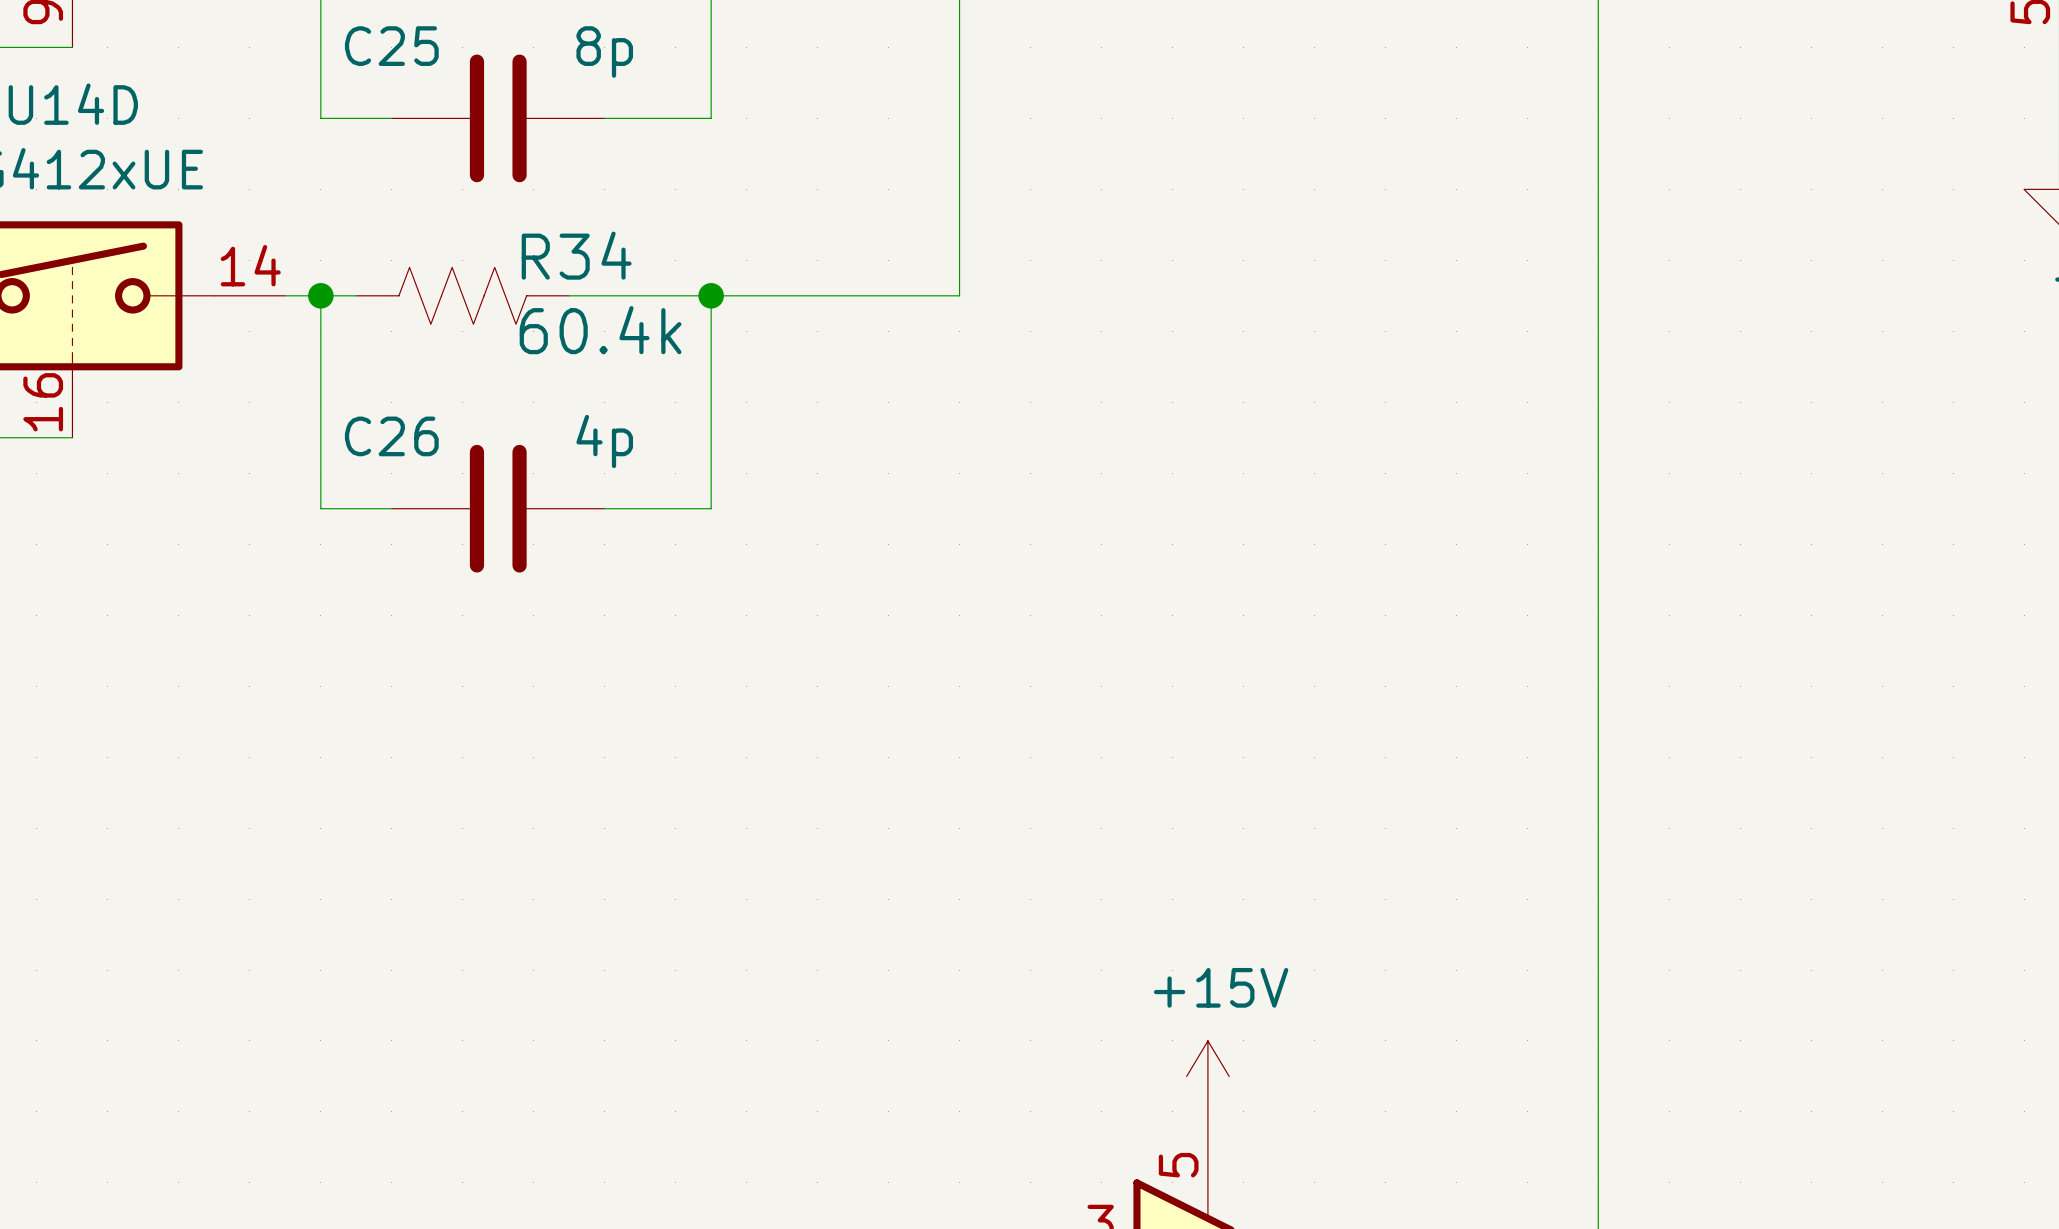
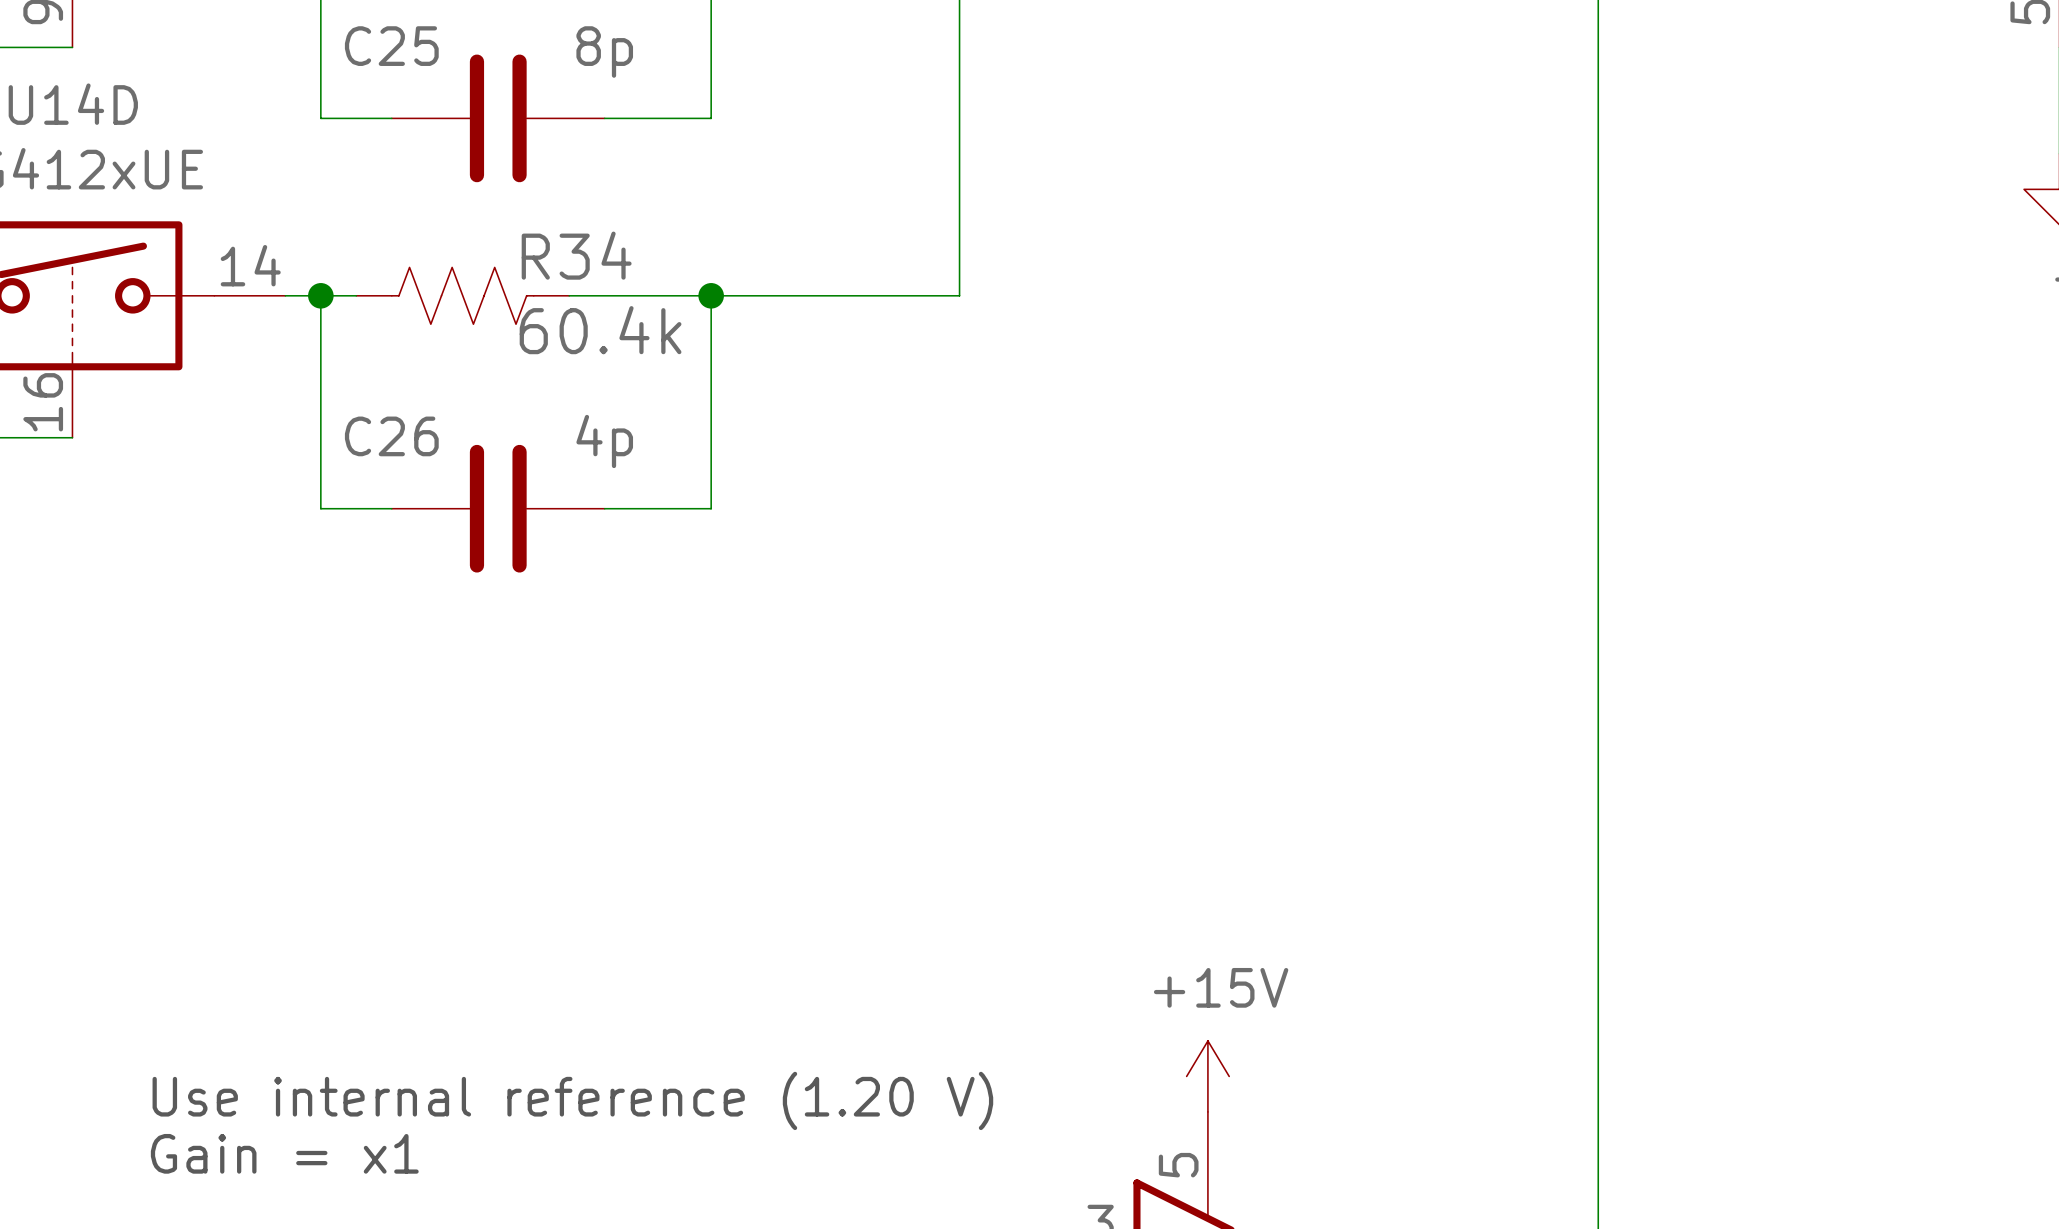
text: none -> Use internal reference (1.20 V) (572, 1100)
text: none -> Gain = x1 (284, 1153)

